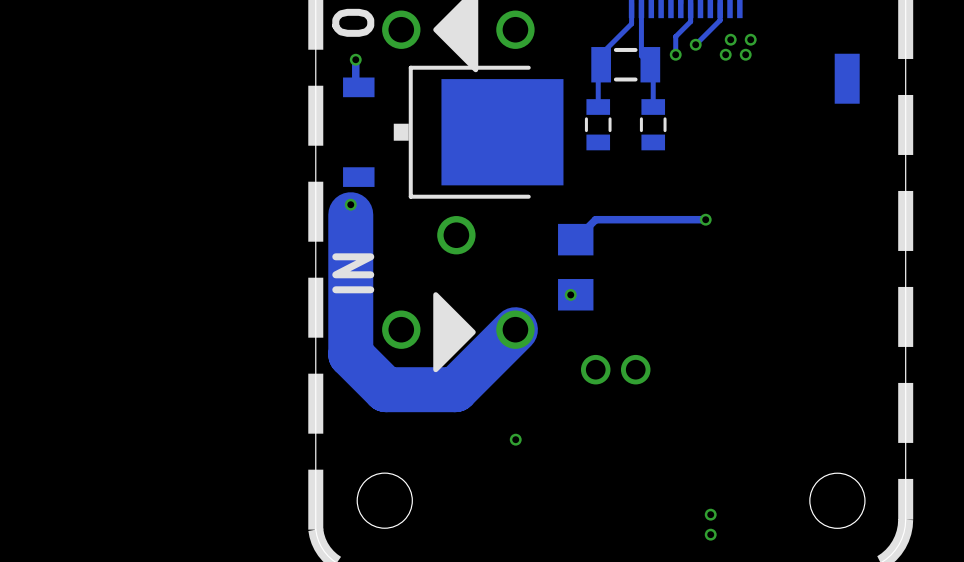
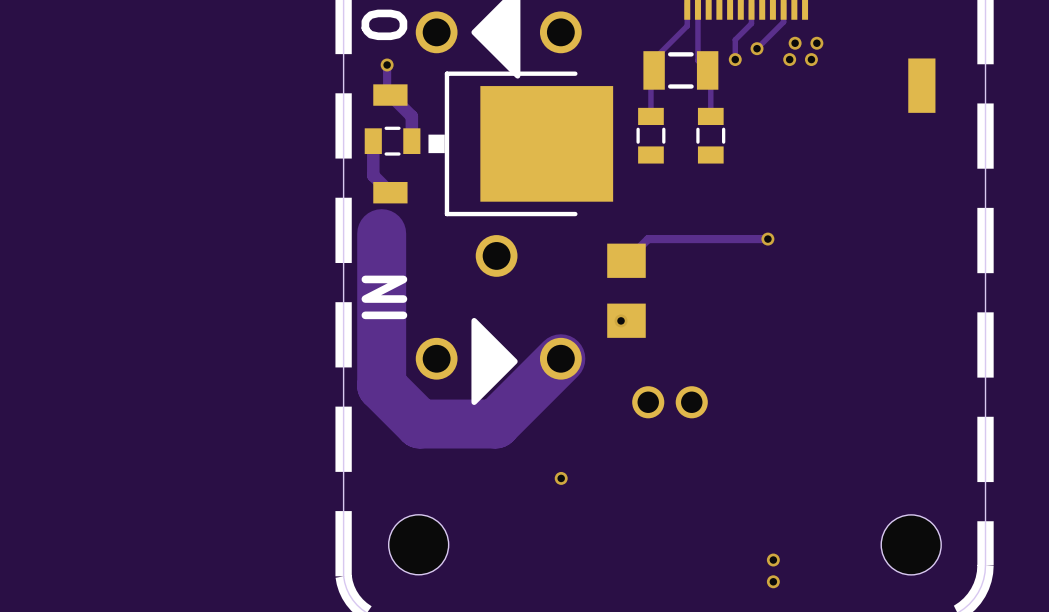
track: none -> (390, 95) (411, 116) (411, 141)
track: none -> (373, 141) (373, 175) (390, 192)
part: none -> (392, 141)
via: (350, 204) -> none

